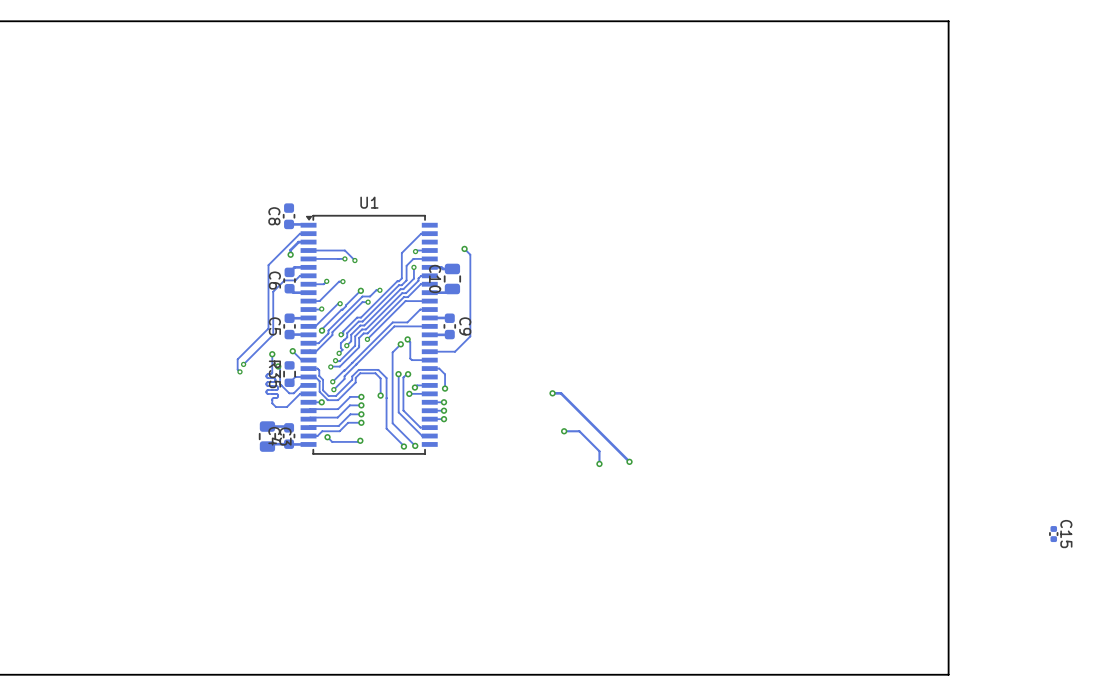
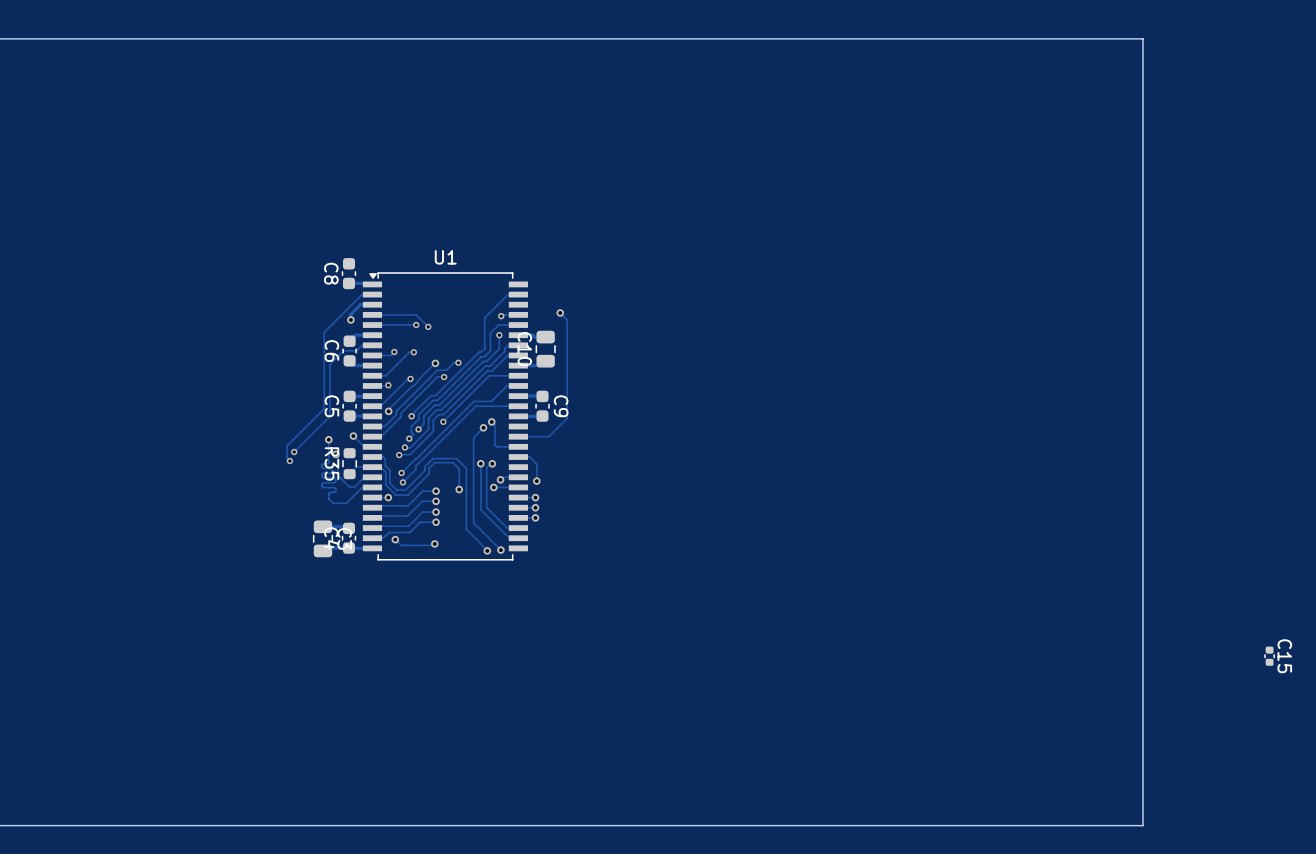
track: (552, 393) (560, 393) (629, 461) -> none
via: (552, 393) -> none
track: (564, 431) (579, 431) (599, 451) (599, 463) -> none
via: (564, 431) -> none
via: (629, 461) -> none
via: (599, 463) -> none

